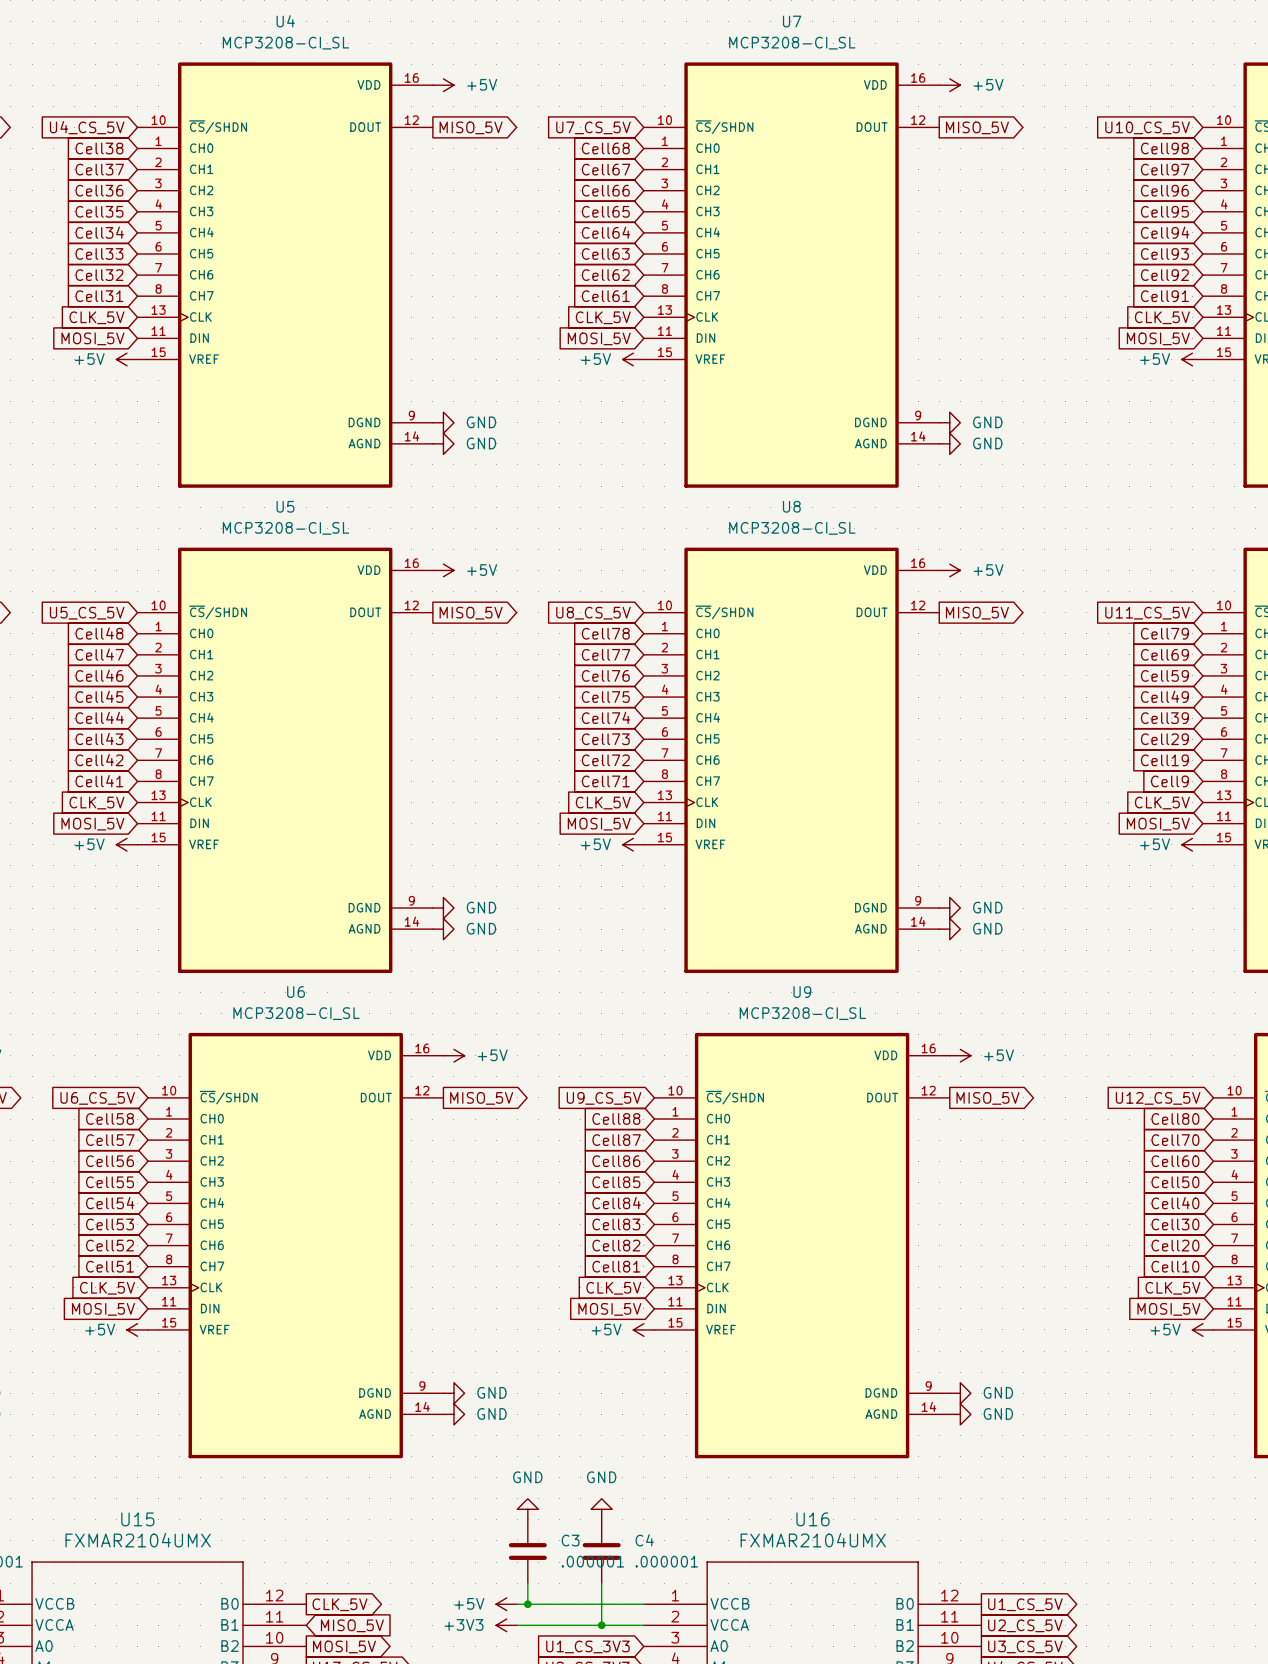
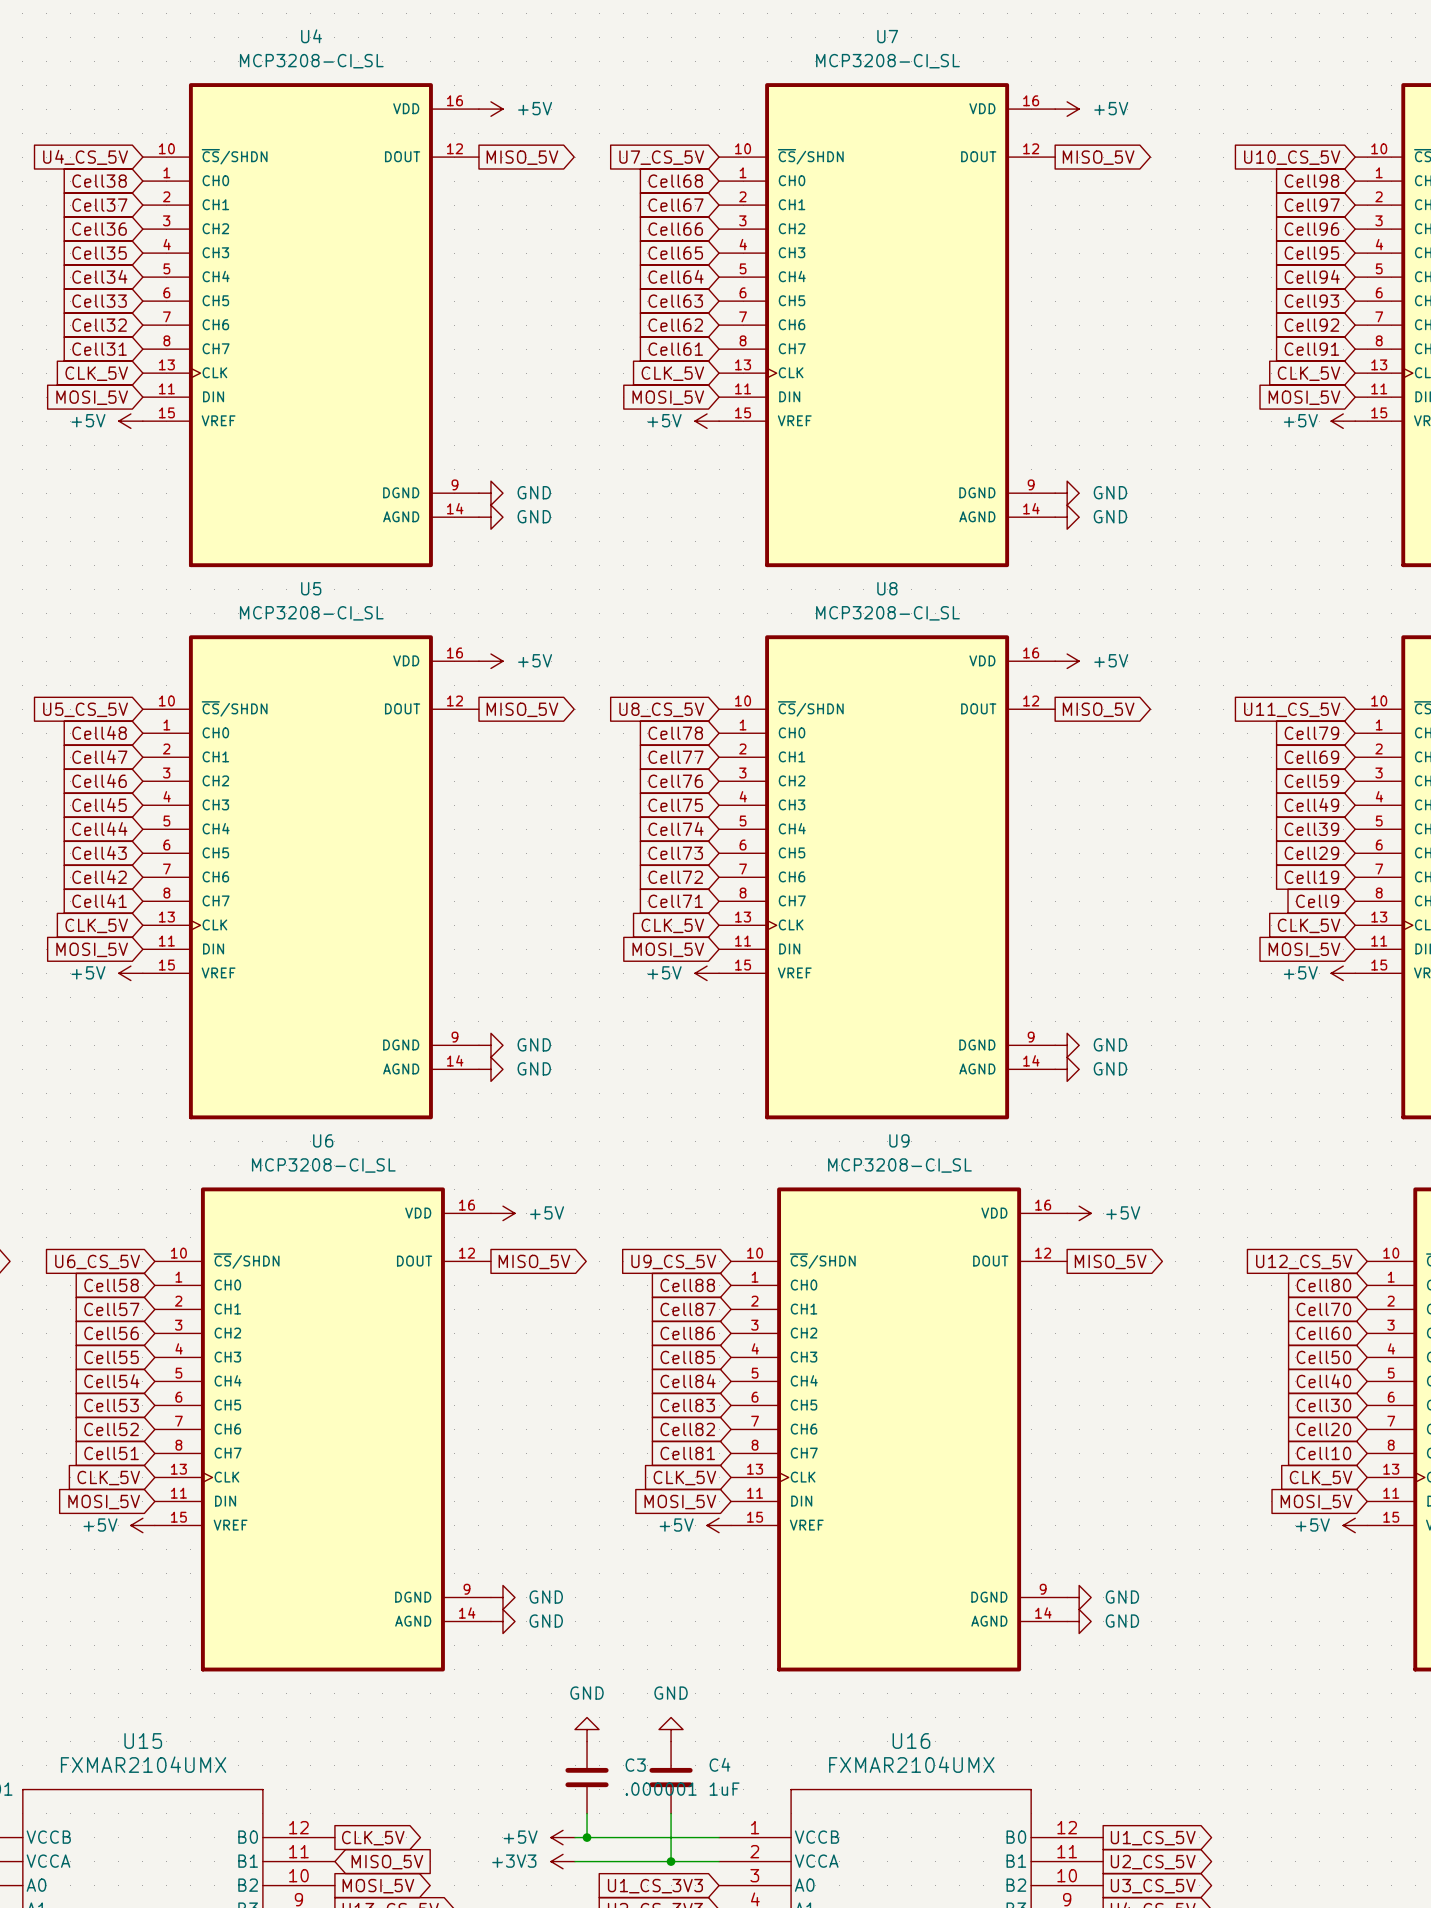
C4 value: .000001 (666, 1561) -> 1uF (724, 1789)

